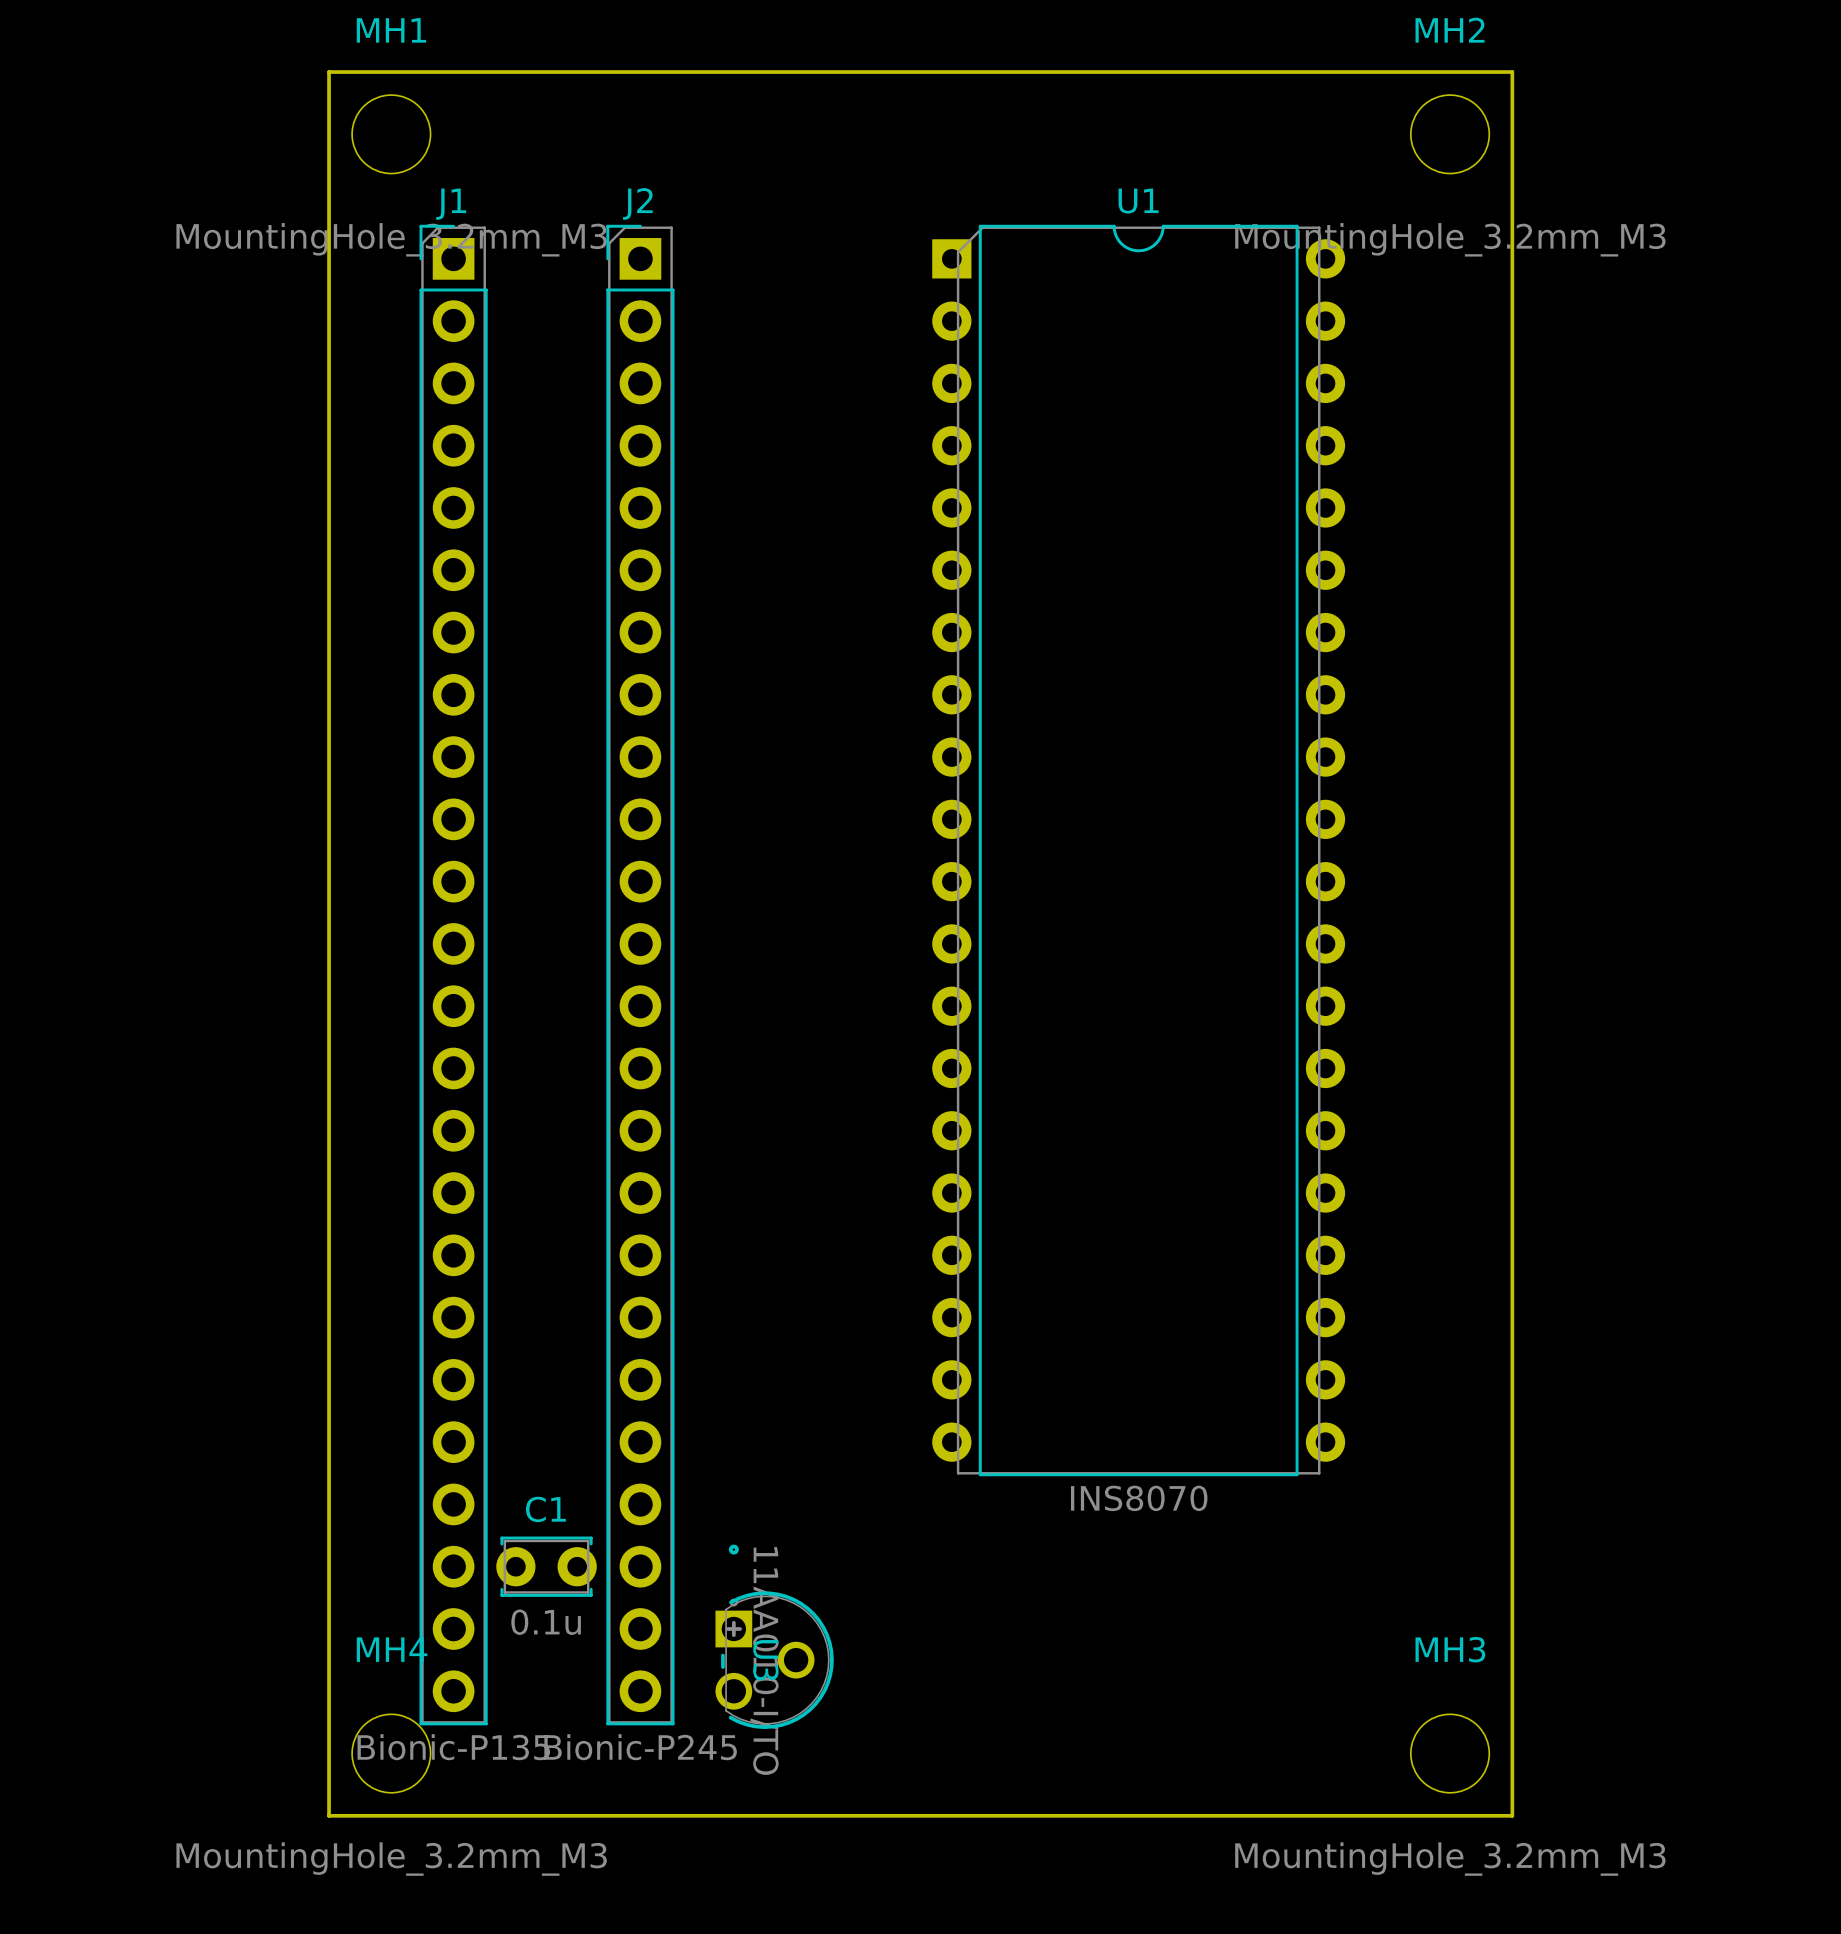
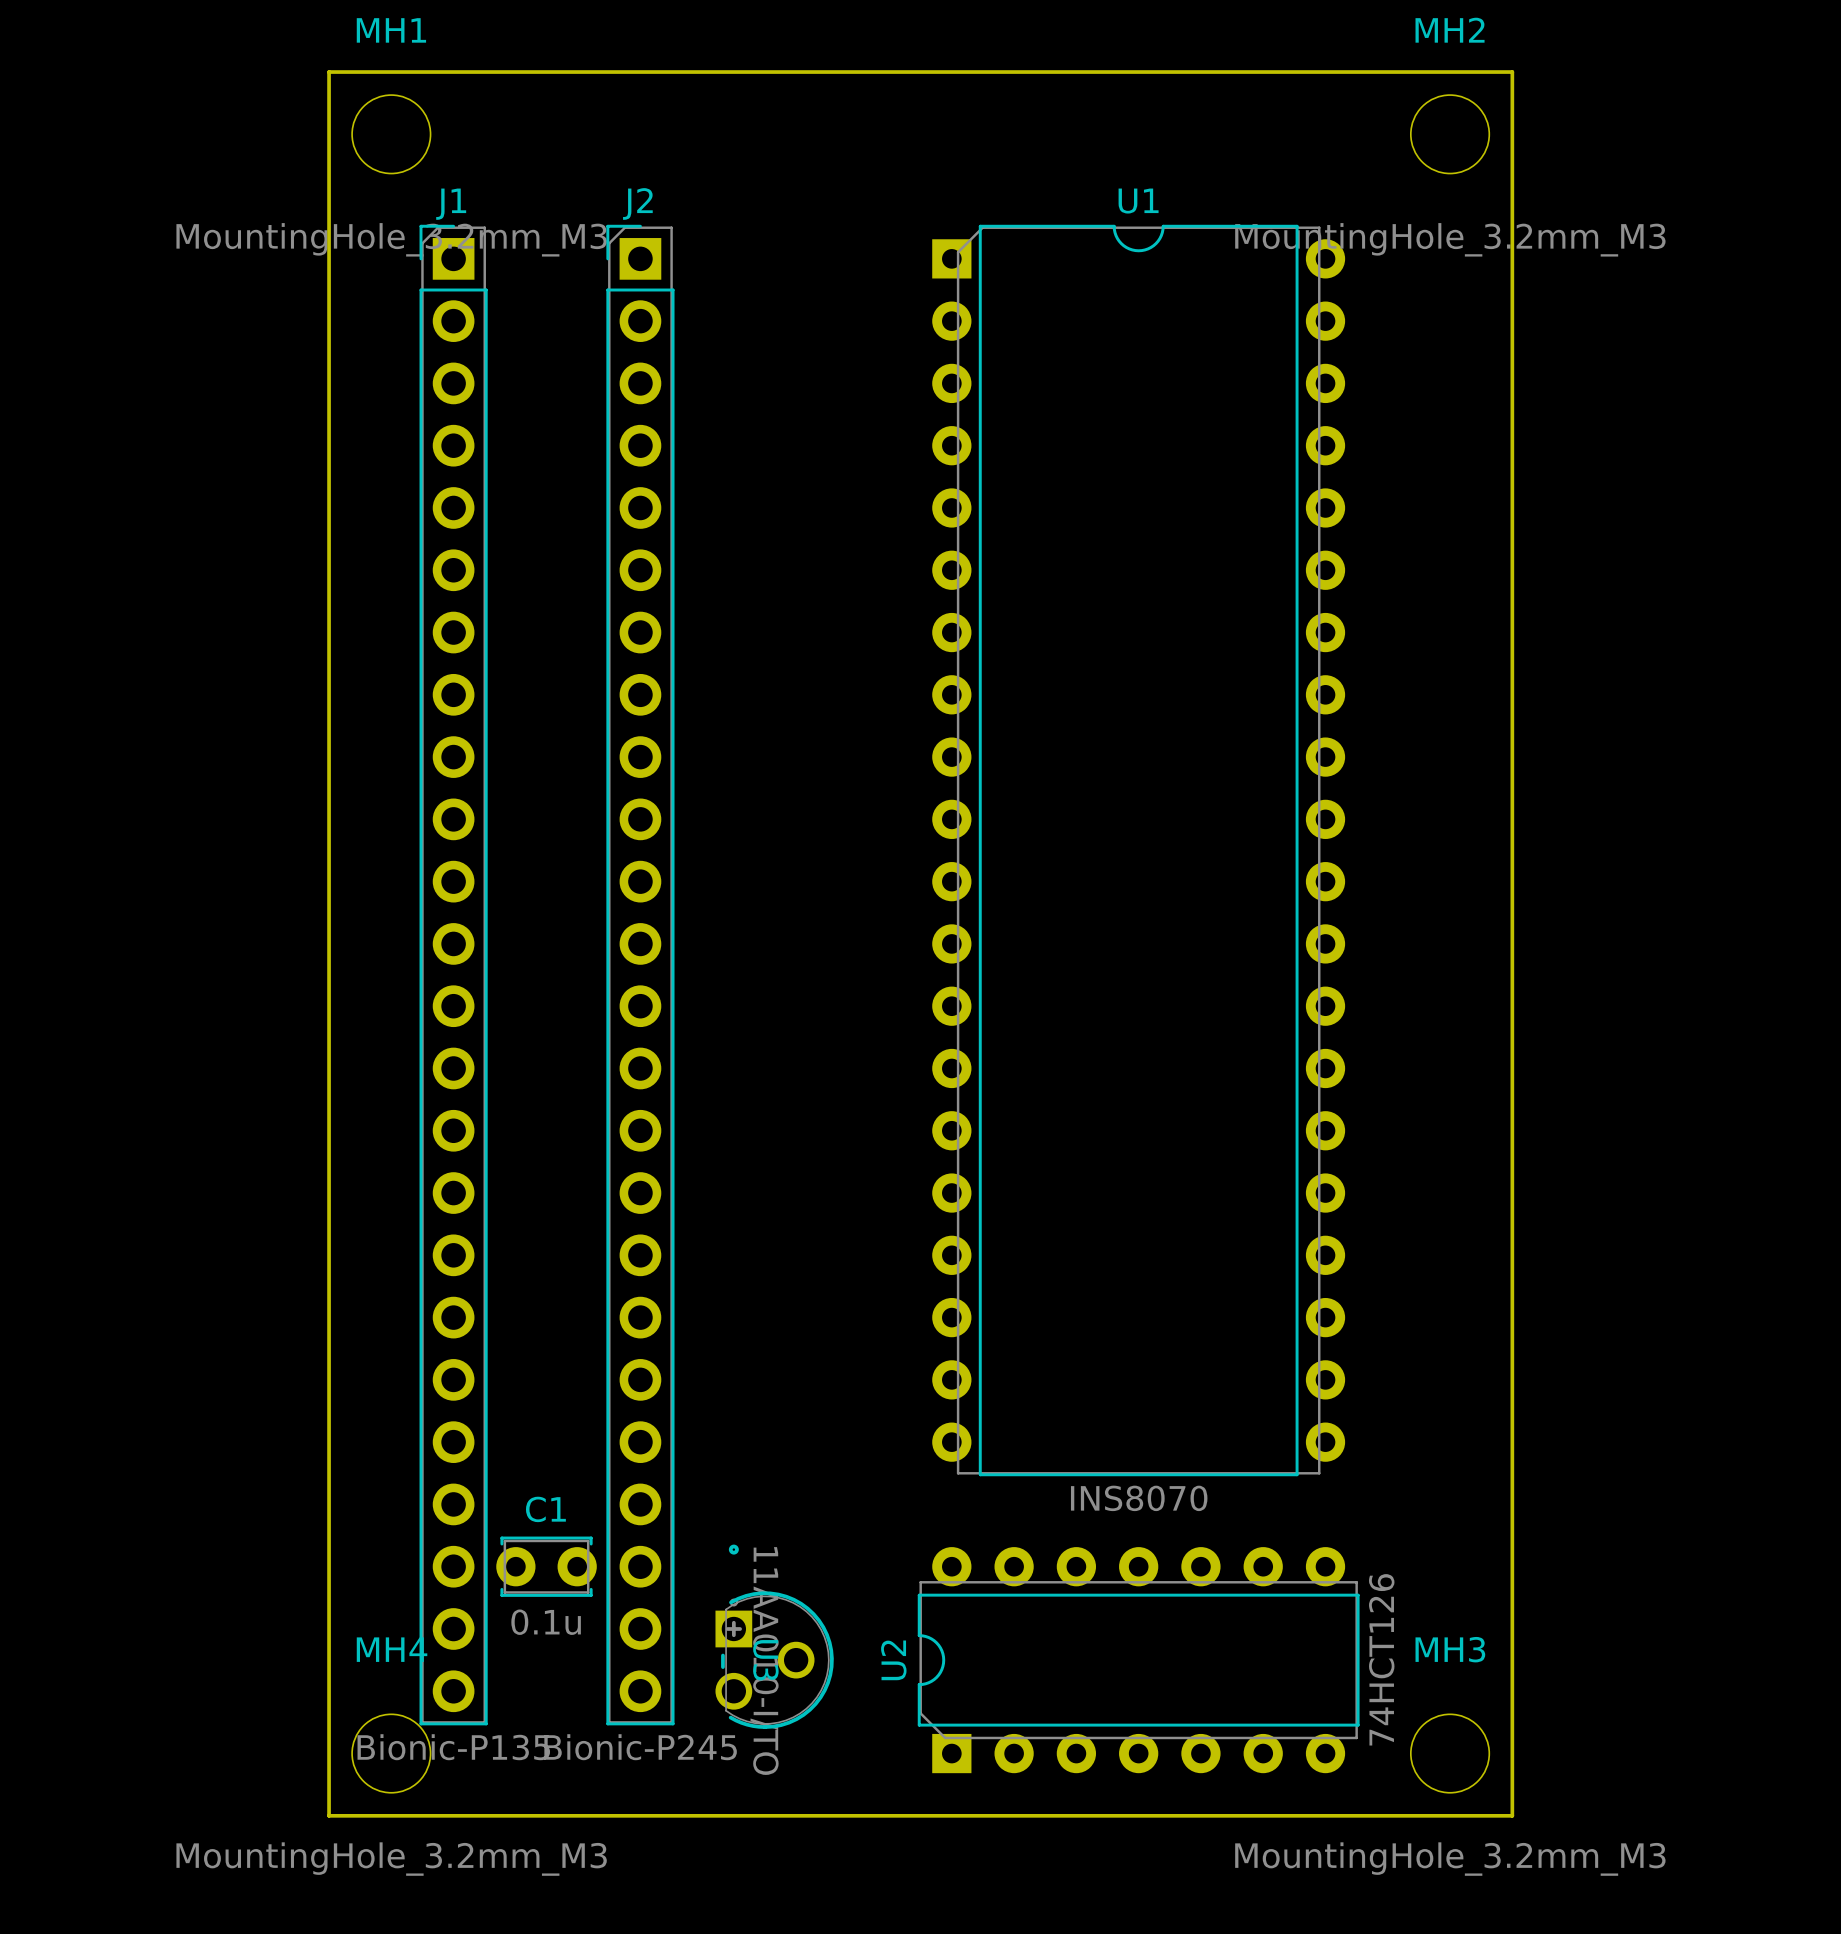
U2: none -> 74HCT126 (1138, 1660)

